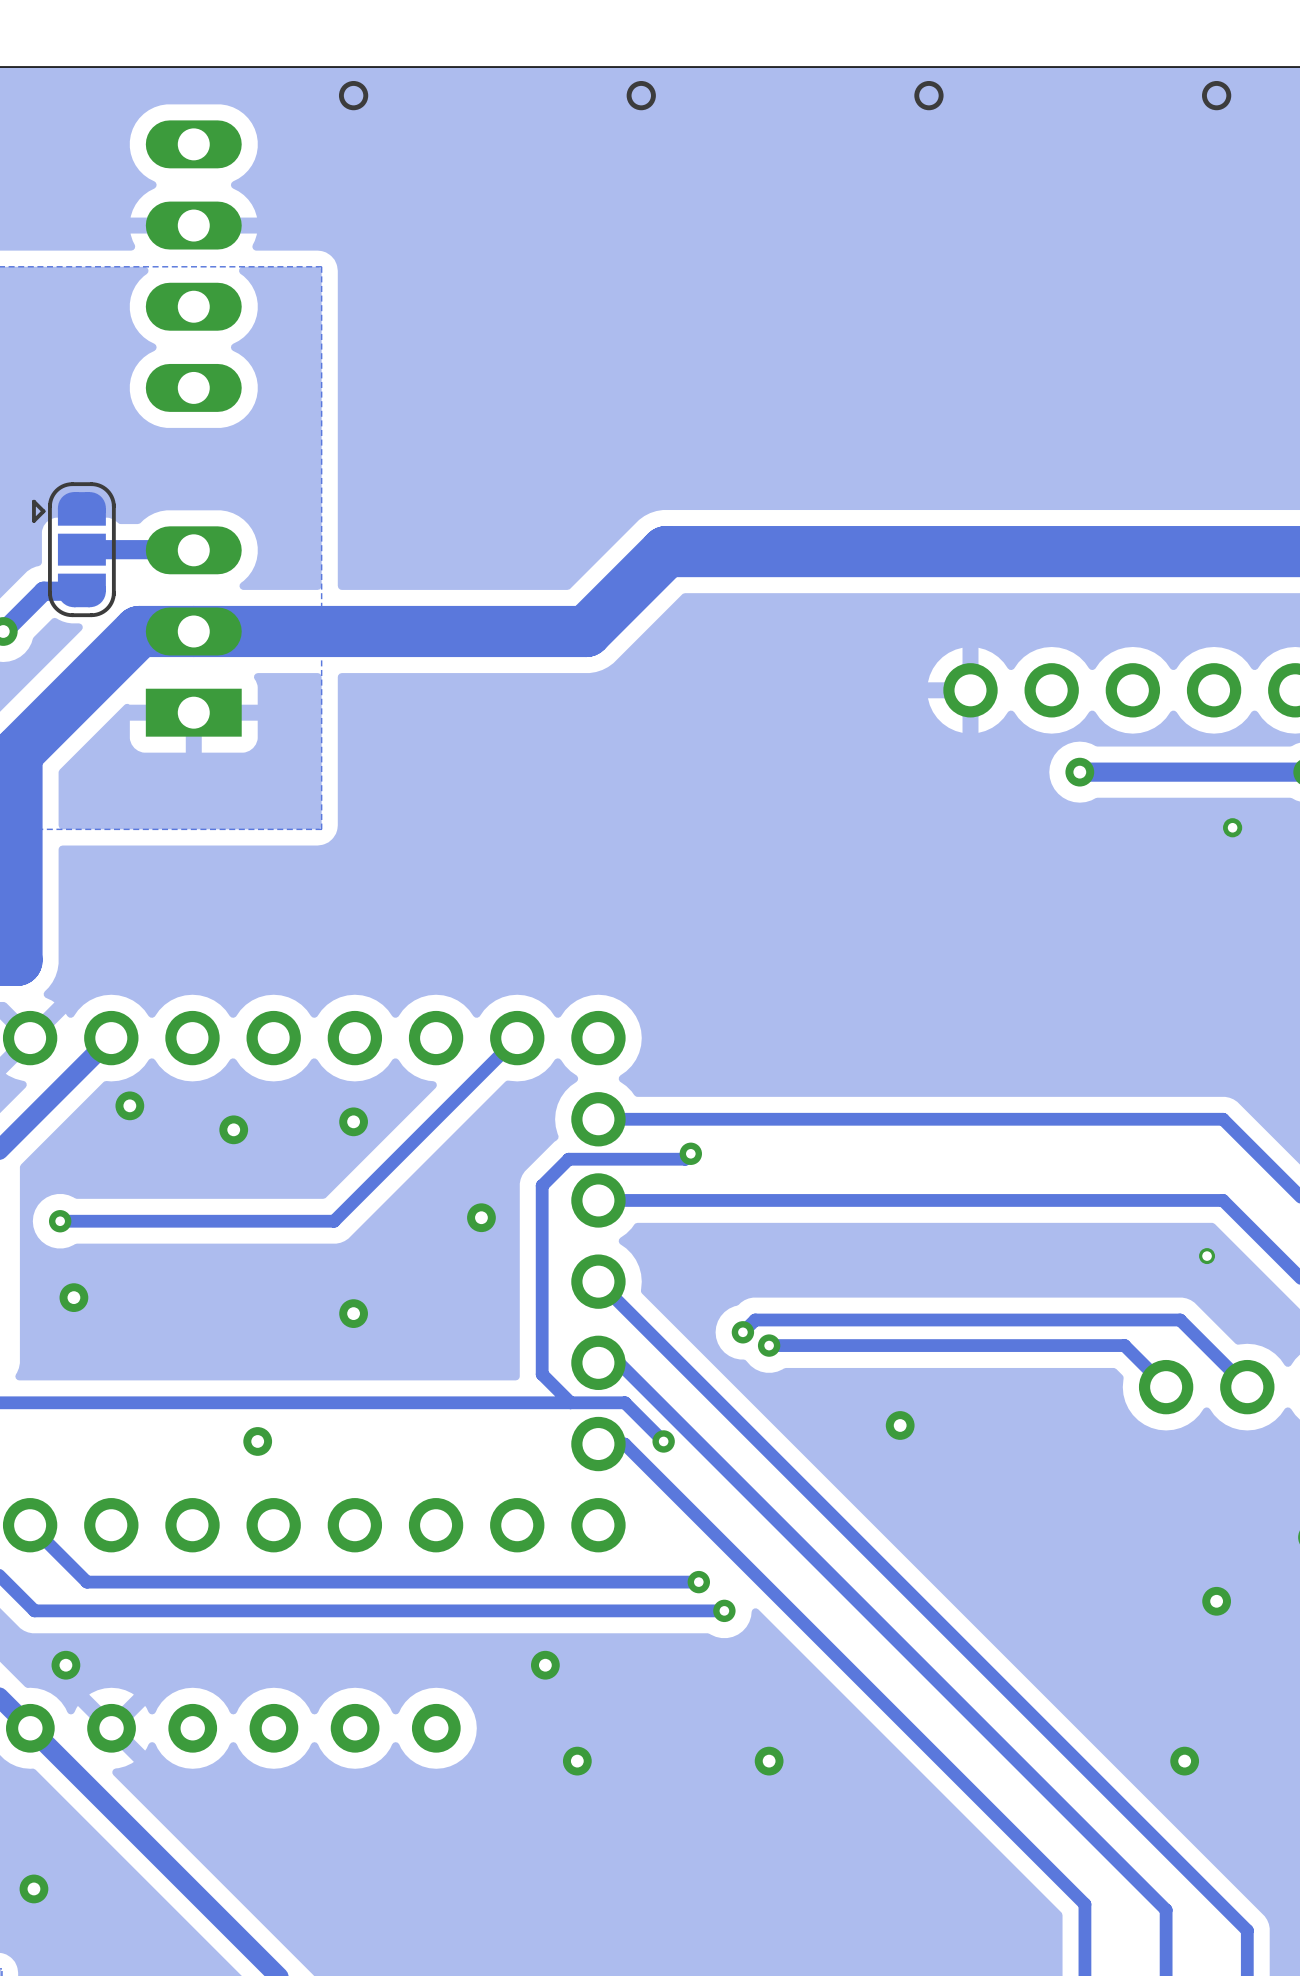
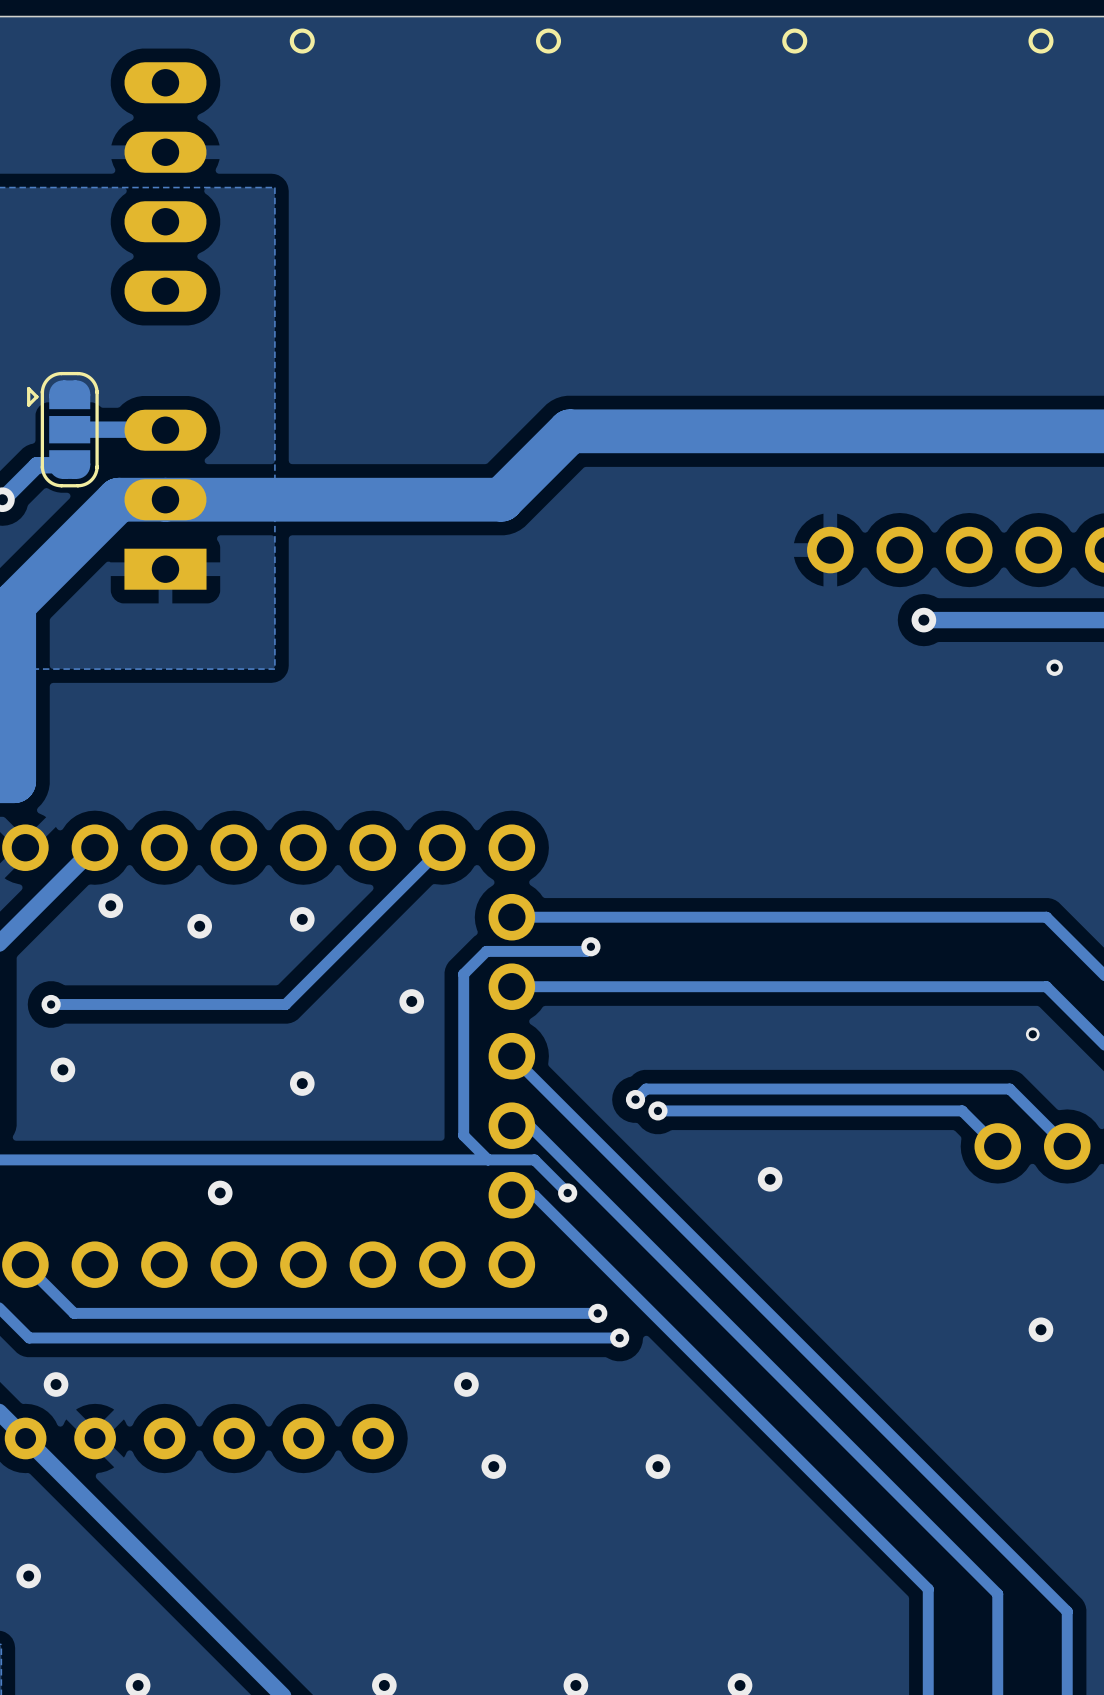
via: (1184, 1761) -> none

